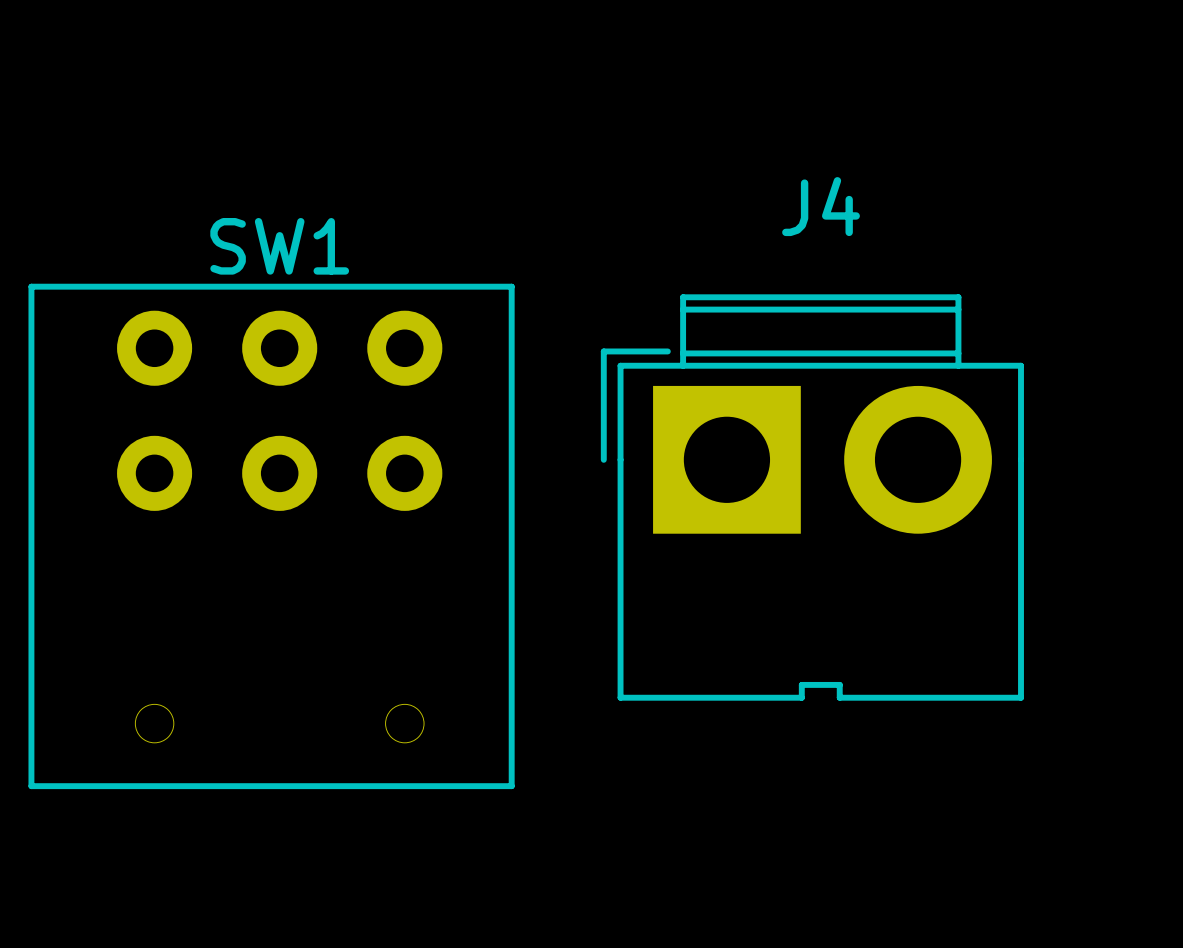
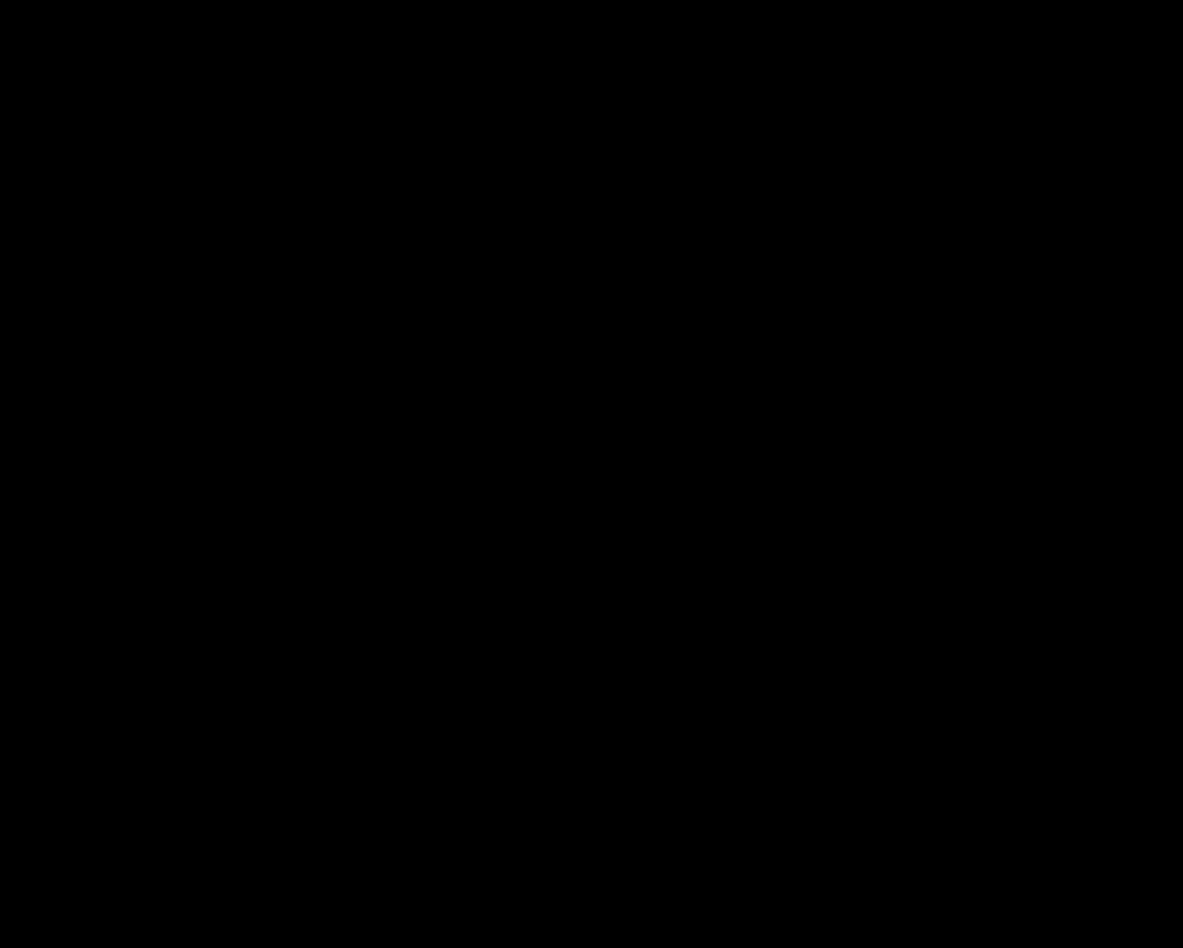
J4: (812, 497) -> none
SW1: (271, 536) -> none

